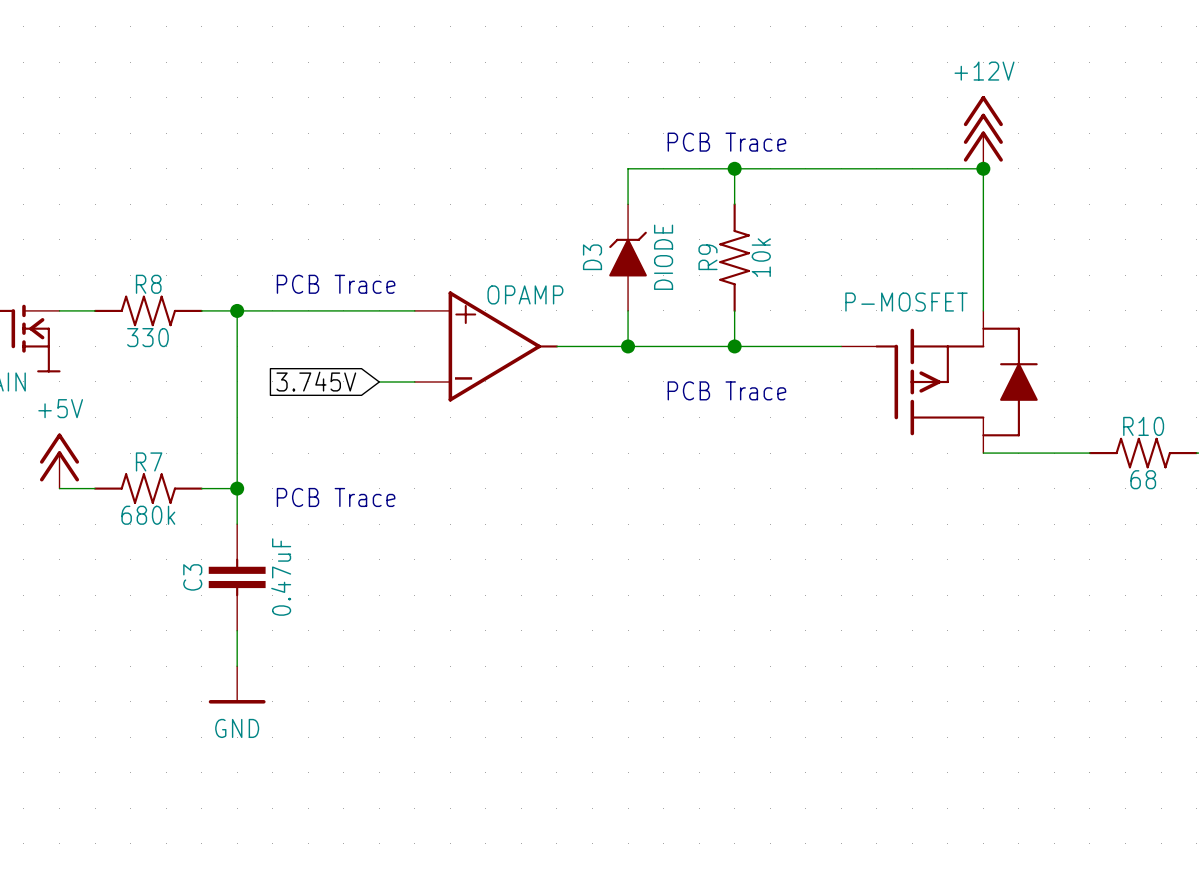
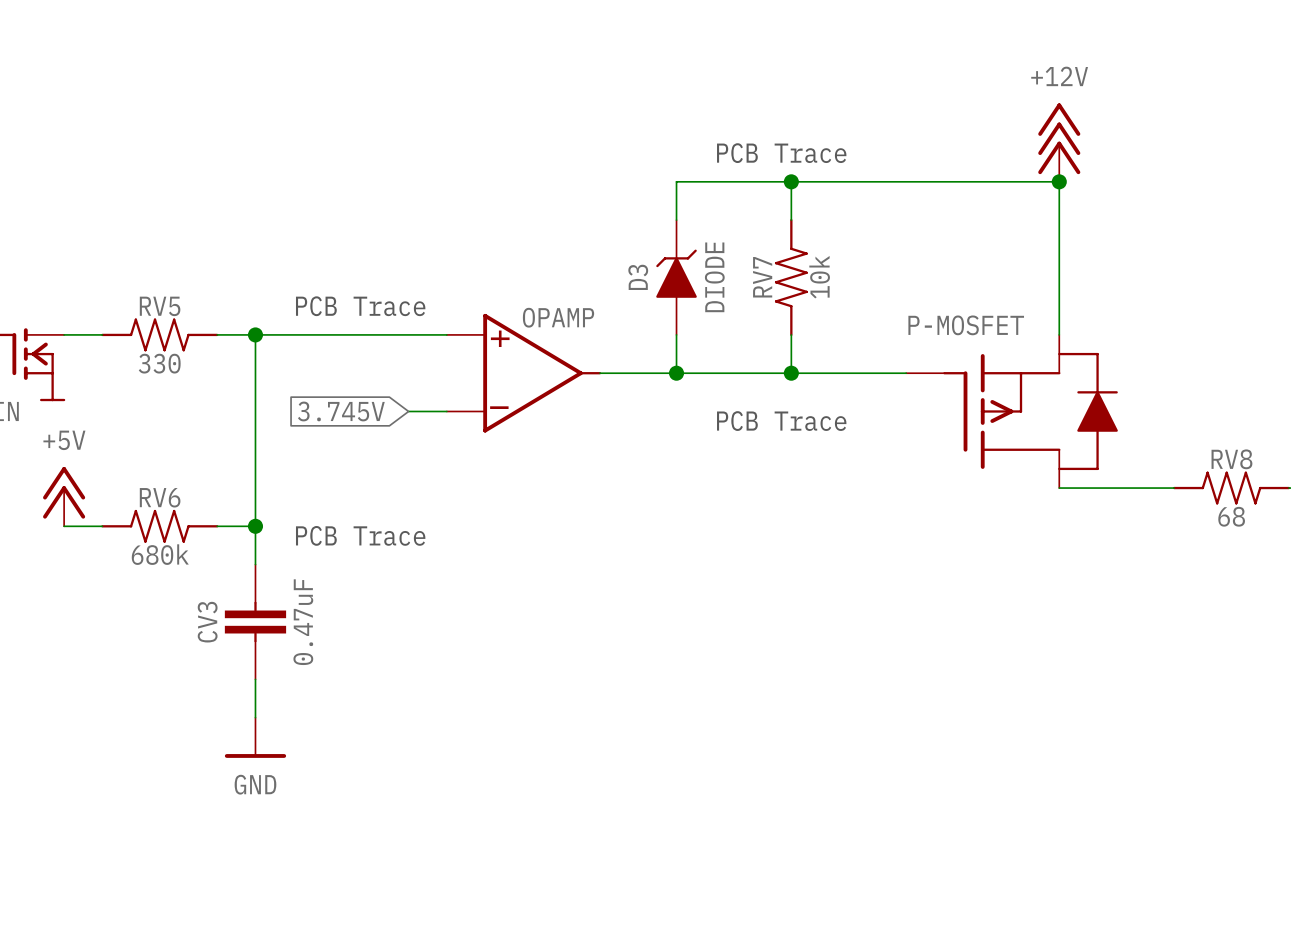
R9 name: R9 (707, 257) -> RV7 (762, 277)
R8 name: R8 (148, 284) -> RV5 (160, 306)
R10 name: R10 (1143, 426) -> RV8 (1231, 459)
R7 name: R7 (149, 461) -> RV6 (160, 497)
C3 name: C3 (192, 577) -> CV3 (207, 622)

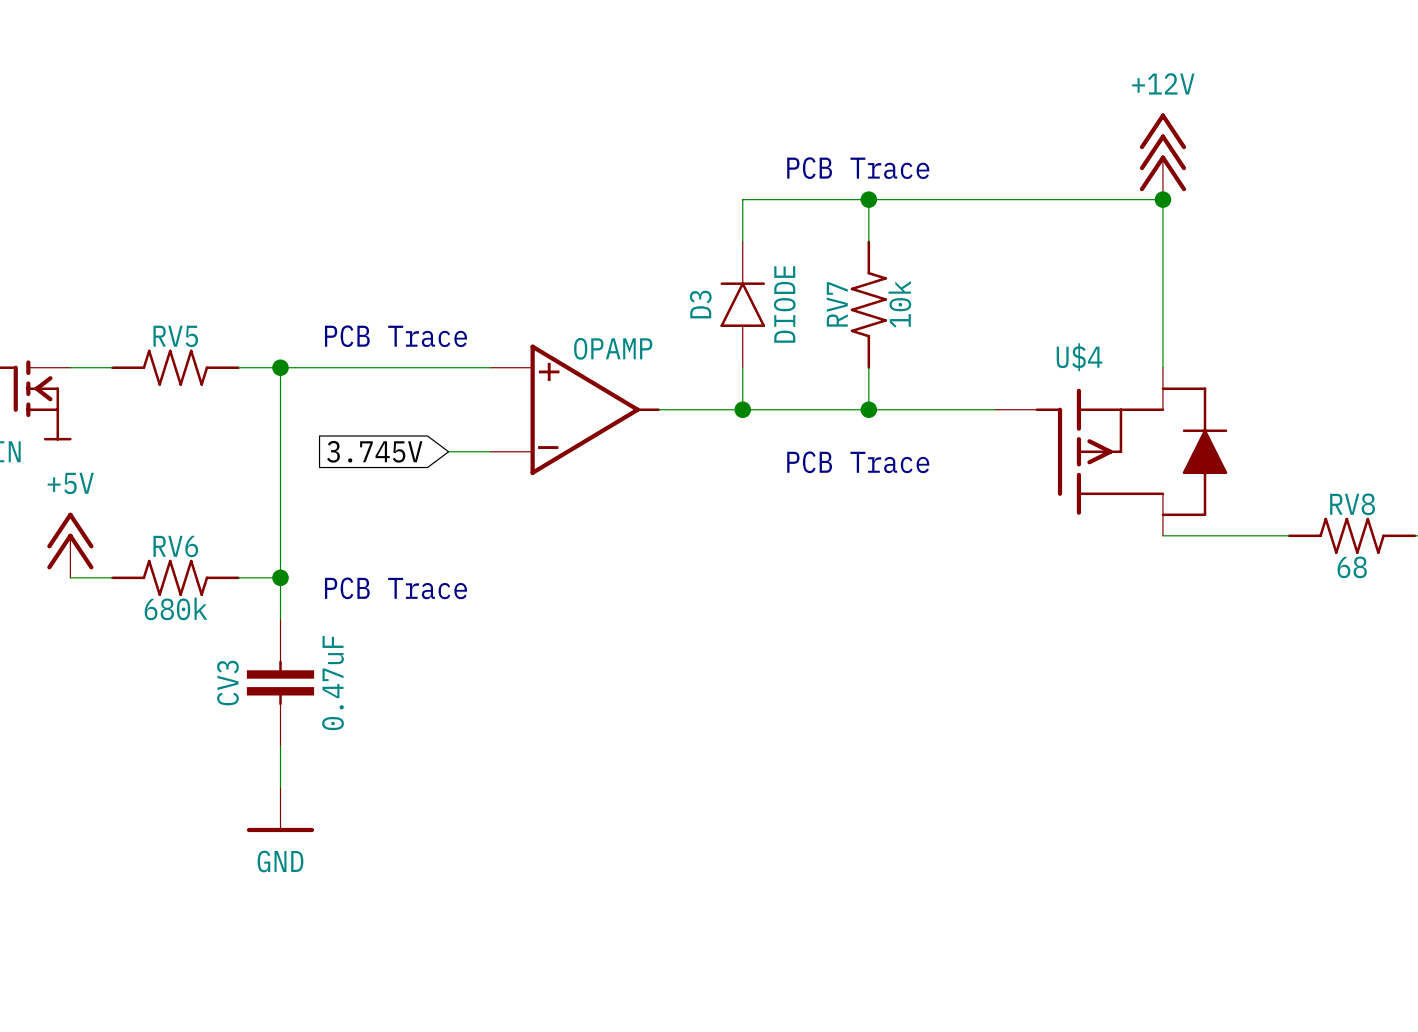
D3 symbol: [656, 220, 697, 335] -> [720, 241, 766, 368]
U$4 text: P-MOSFET (966, 325) -> none
U$4 name: none -> U$4 (1079, 357)
RV5 value: 330 (159, 363) -> none

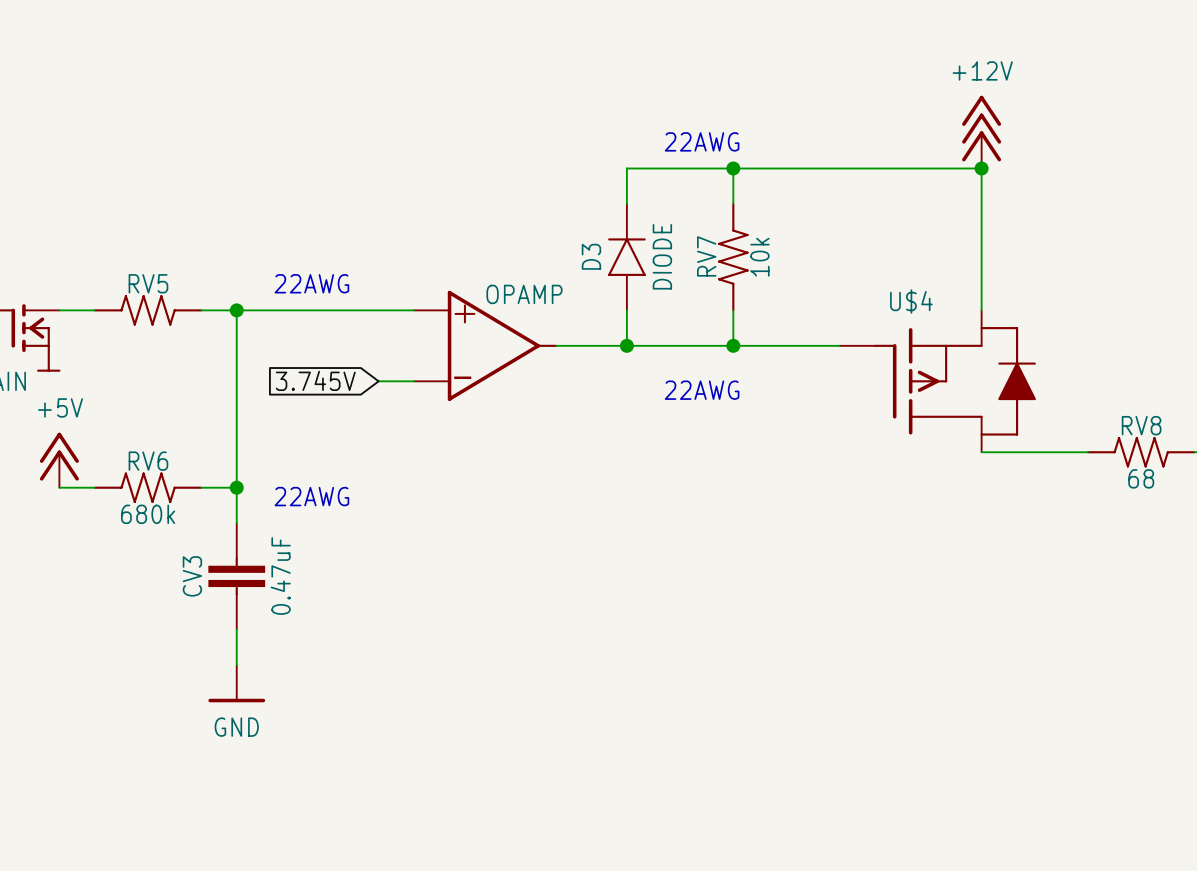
text: PCB Trace (858, 168) -> 22AWG (702, 141)
text: PCB Trace (395, 336) -> 22AWG (311, 283)
text: PCB Trace (858, 462) -> 22AWG (702, 390)
text: PCB Trace (395, 588) -> 22AWG (311, 496)

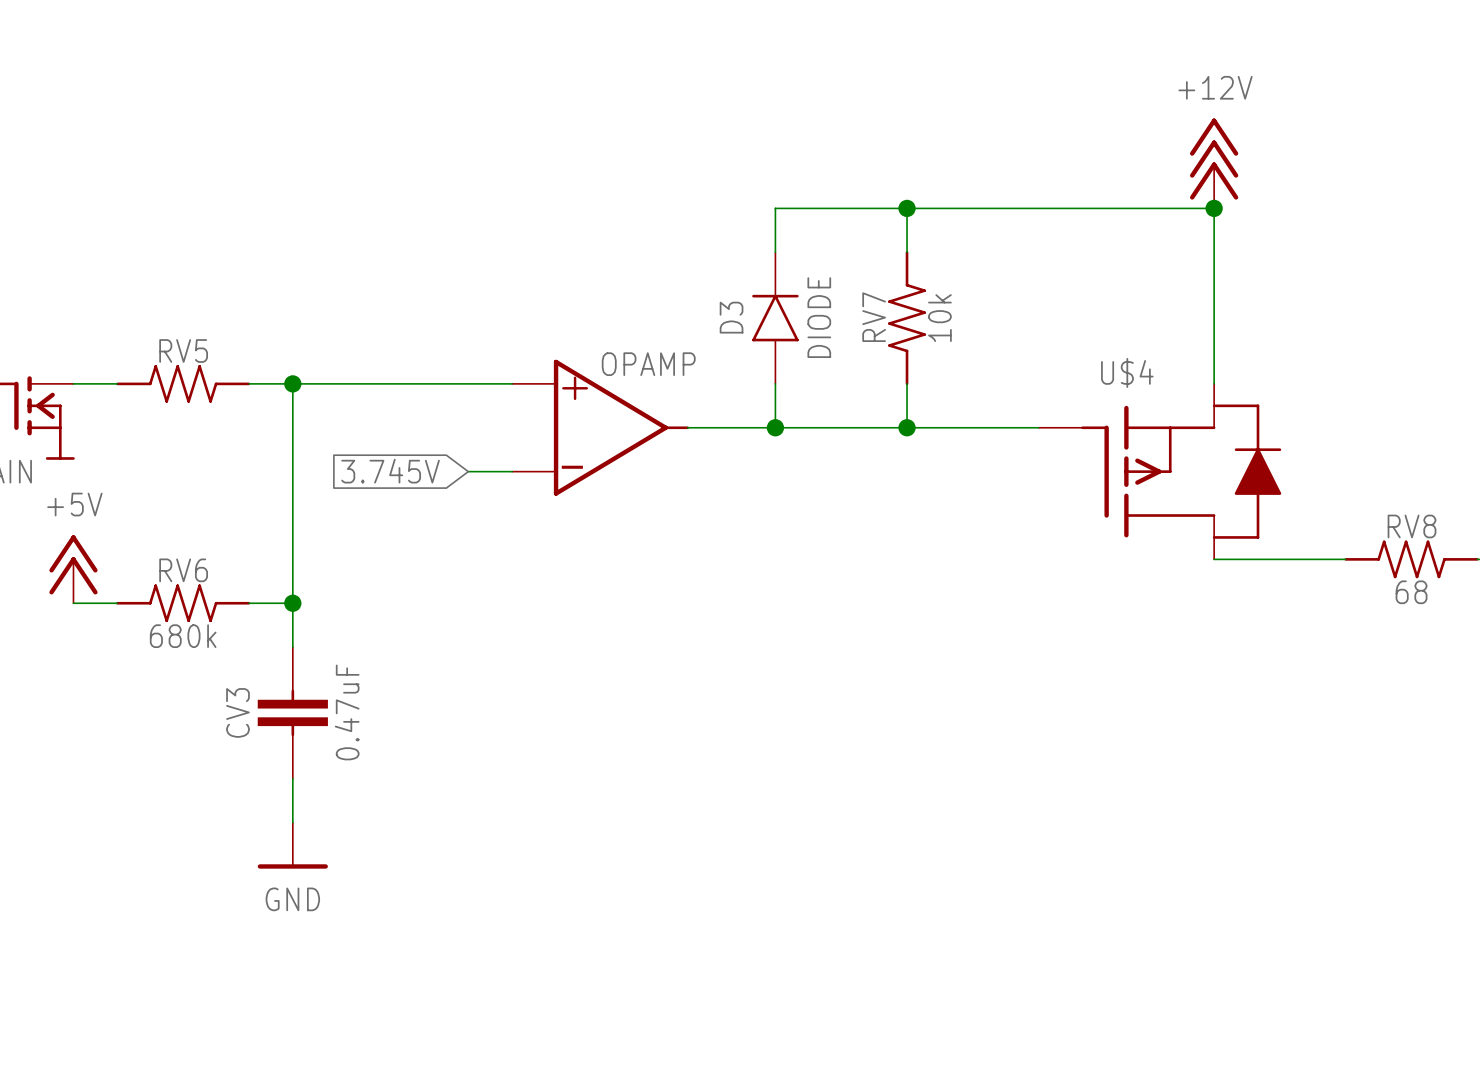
text: 22AWG (702, 141) -> none
text: 22AWG (311, 283) -> none
text: 22AWG (702, 390) -> none
text: 22AWG (311, 496) -> none

